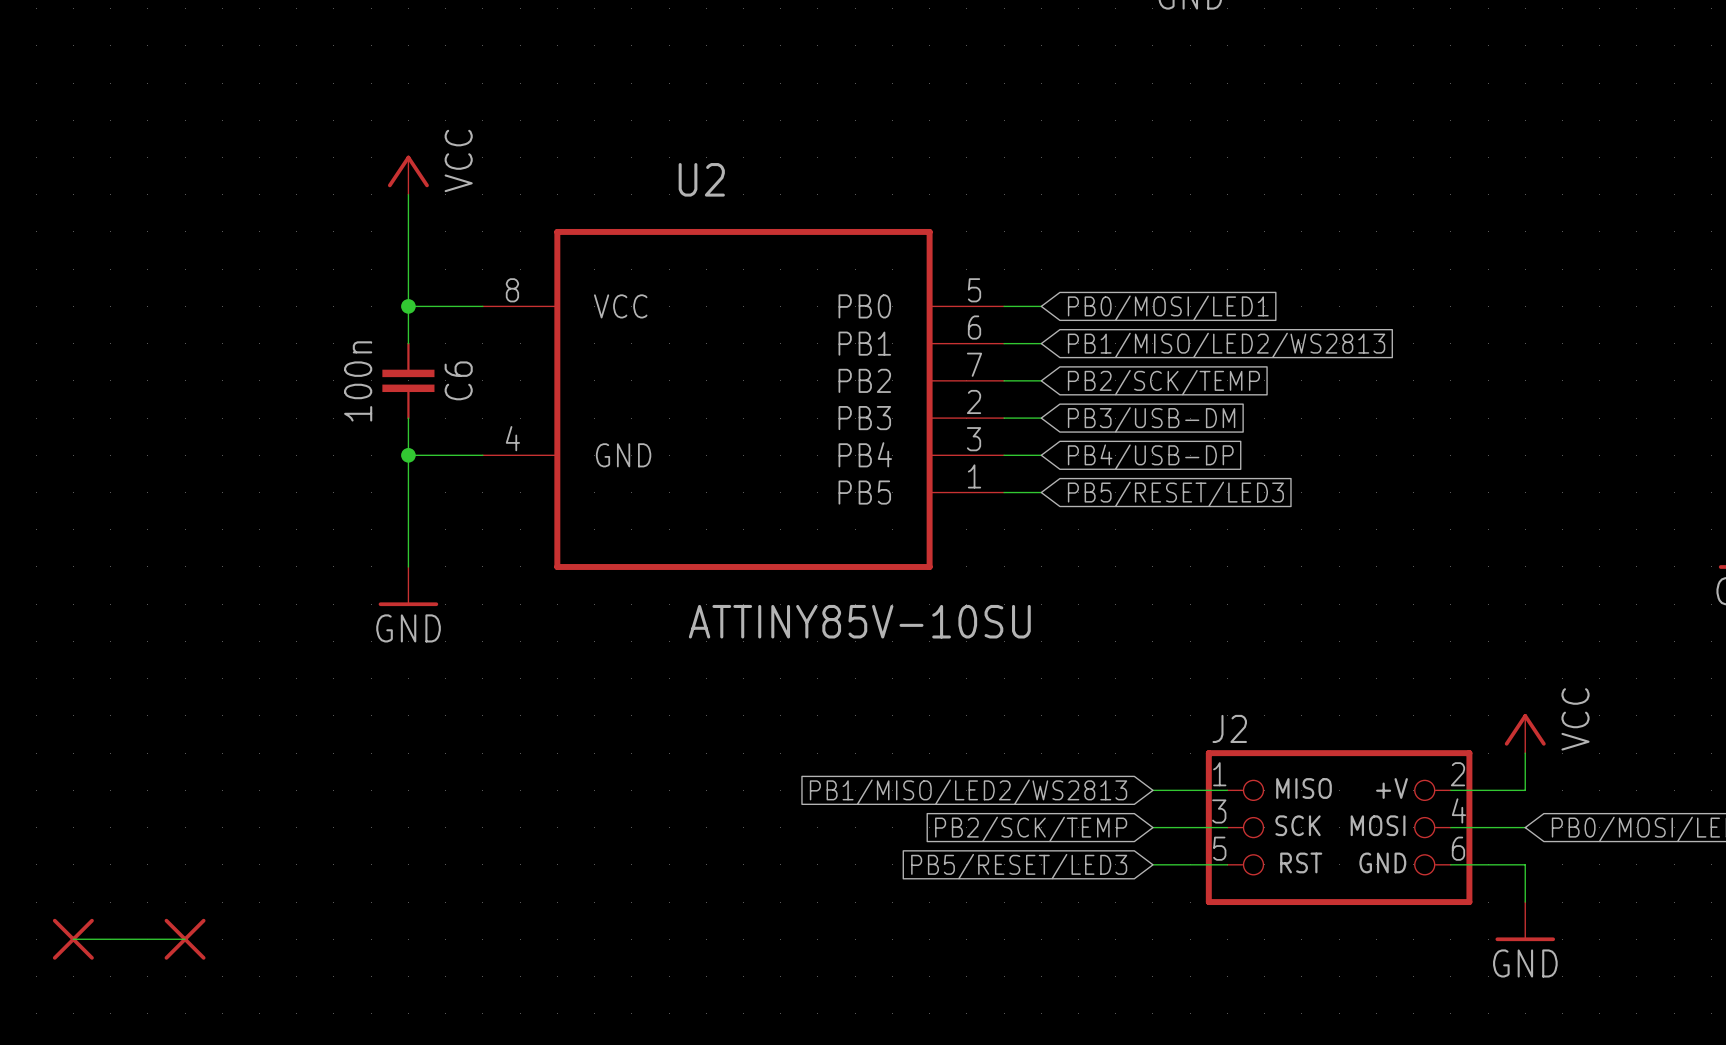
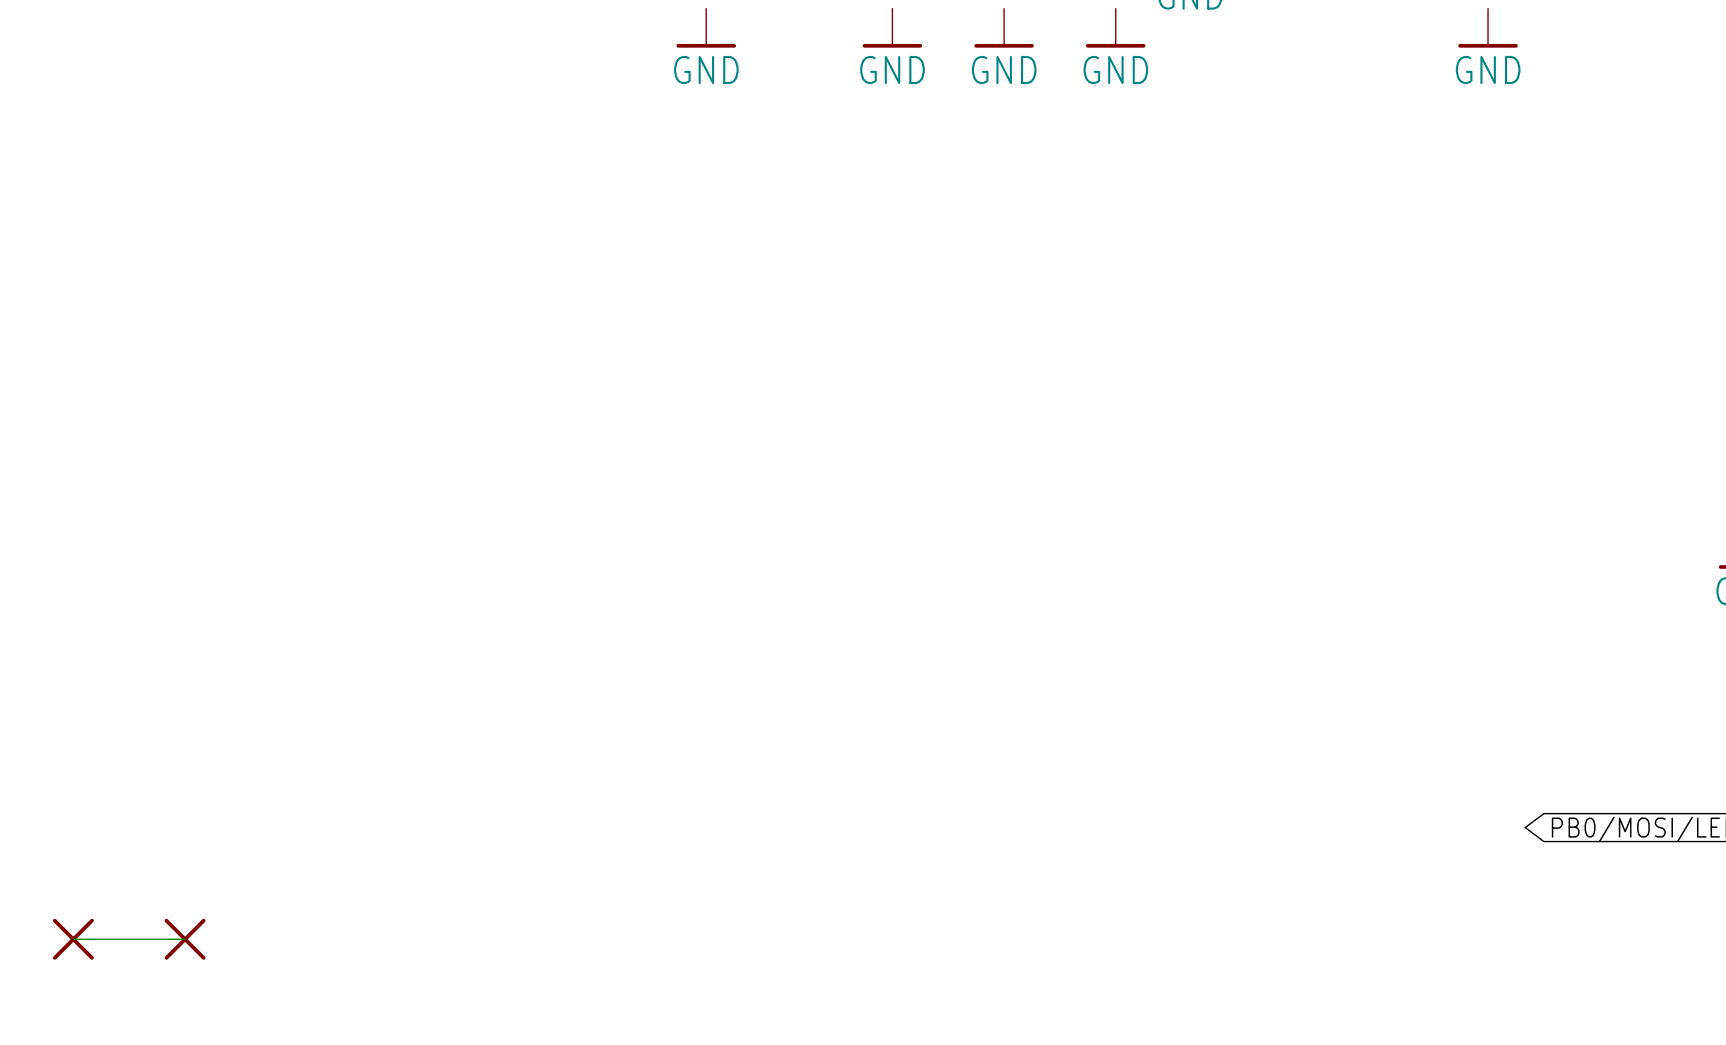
power symbol: none -> GND (706, 28)
power symbol: none -> GND (892, 28)
power symbol: none -> GND (1004, 28)
power symbol: none -> GND (1115, 28)
power symbol: none -> GND (1488, 28)
power symbol: VCC (408, 175) -> none
wire: (408, 194) (408, 343) -> none
wire: (408, 306) (482, 306) -> none
junction: (408, 306) -> none
wire: (1004, 306) (1041, 306) -> none
global label: PB0/MOSI/LED1 (1168, 308) -> none
wire: (1004, 343) (1041, 343) -> none
global label: PB1/MISO/LED2/WS2813 (1226, 345) -> none
C6: 100n (408, 380) -> none
wire: (1004, 380) (1041, 380) -> none
global label: PB2/SCK/TEMP (1163, 382) -> none
U2: ATTINY85V-10SU (743, 399) -> none
wire: (408, 418) (408, 566) -> none
wire: (1004, 418) (1041, 418) -> none
global label: PB3/USB-DM (1151, 419) -> none
wire: (408, 455) (482, 455) -> none
junction: (408, 455) -> none
wire: (1004, 455) (1041, 455) -> none
global label: PB4/USB-DP (1150, 457) -> none
wire: (1004, 492) (1041, 492) -> none
global label: PB5/RESET/LED3 (1175, 494) -> none
power symbol: GND (408, 586) -> none
power symbol: VCC (1525, 733) -> none
wire: (1525, 753) (1525, 790) (1450, 790) -> none
wire: (1152, 790) (1227, 790) -> none
global label: PB1/MISO/LED2/WS2813 (968, 792) -> none
wire: (1152, 827) (1227, 827) -> none
J2: (1339, 827) -> none
wire: (1450, 827) (1525, 827) -> none
global label: PB2/SCK/TEMP (1031, 829) -> none
wire: (1152, 864) (1227, 864) -> none
wire: (1450, 864) (1525, 864) (1525, 902) -> none
global label: PB5/RESET/LED3 (1019, 866) -> none
power symbol: GND (1525, 921) -> none

